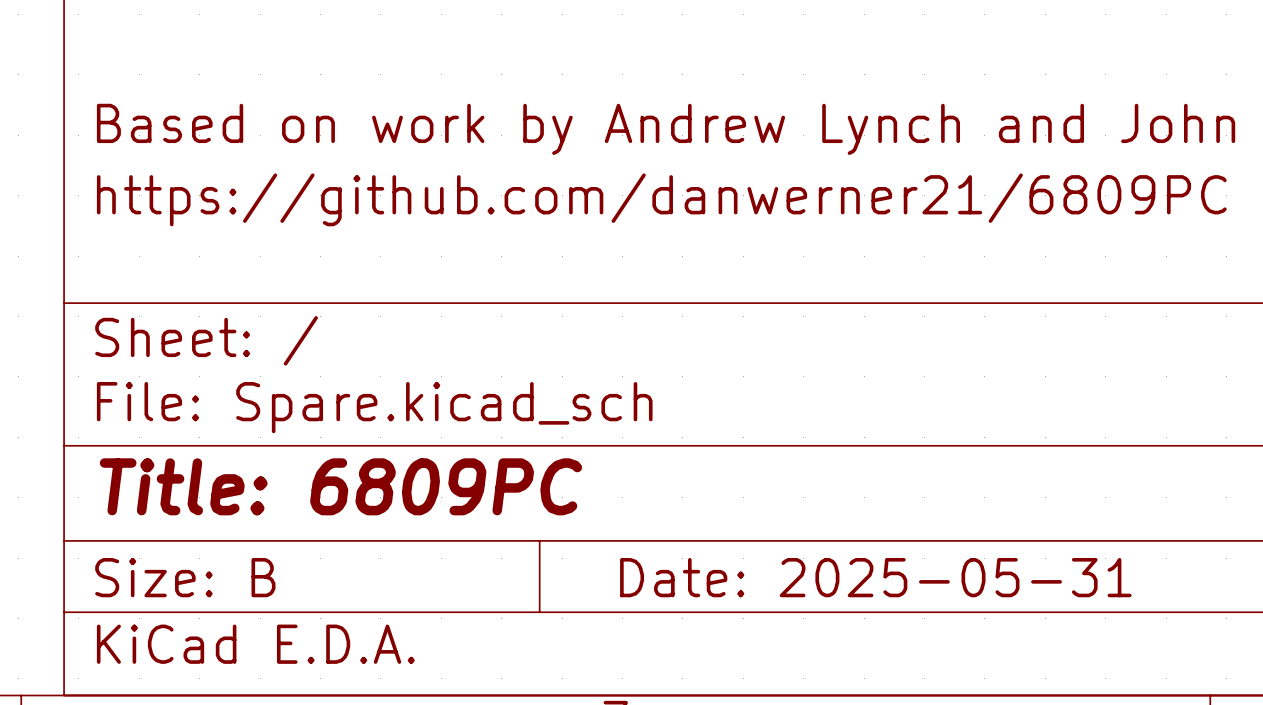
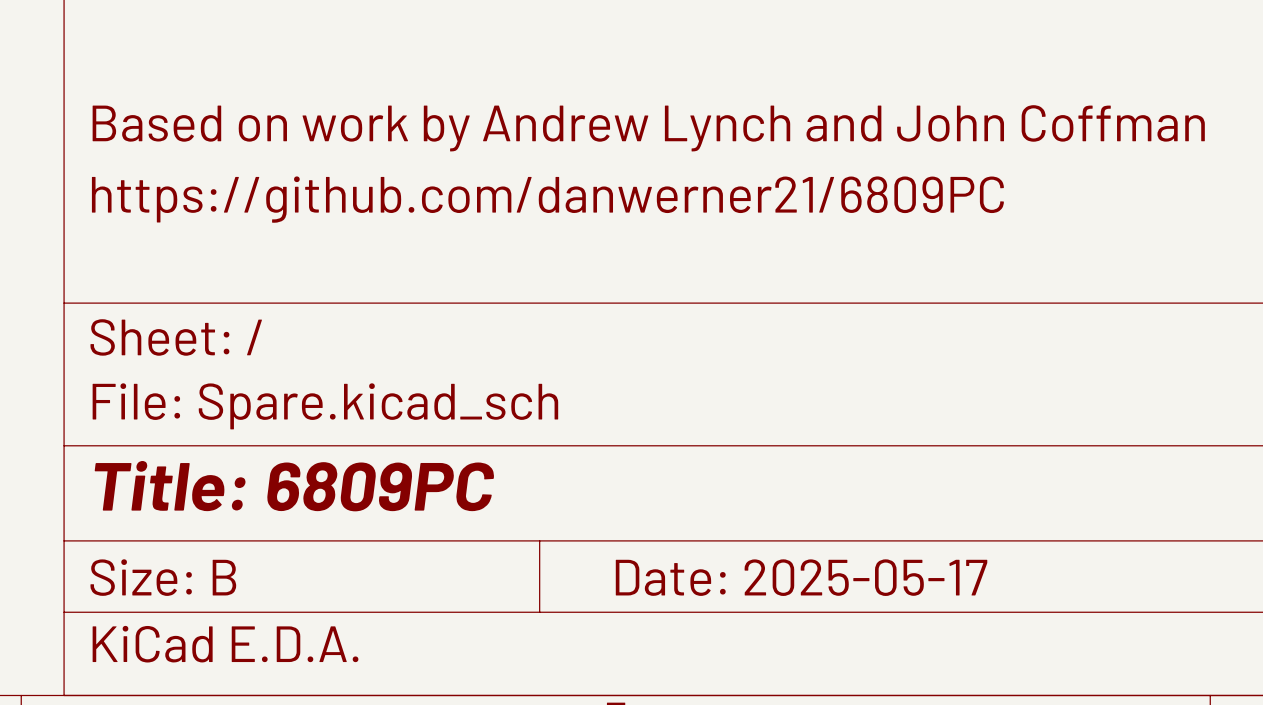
title block: Date: 2025-05-31 (875, 577) -> Date: 2025-05-17 (801, 577)

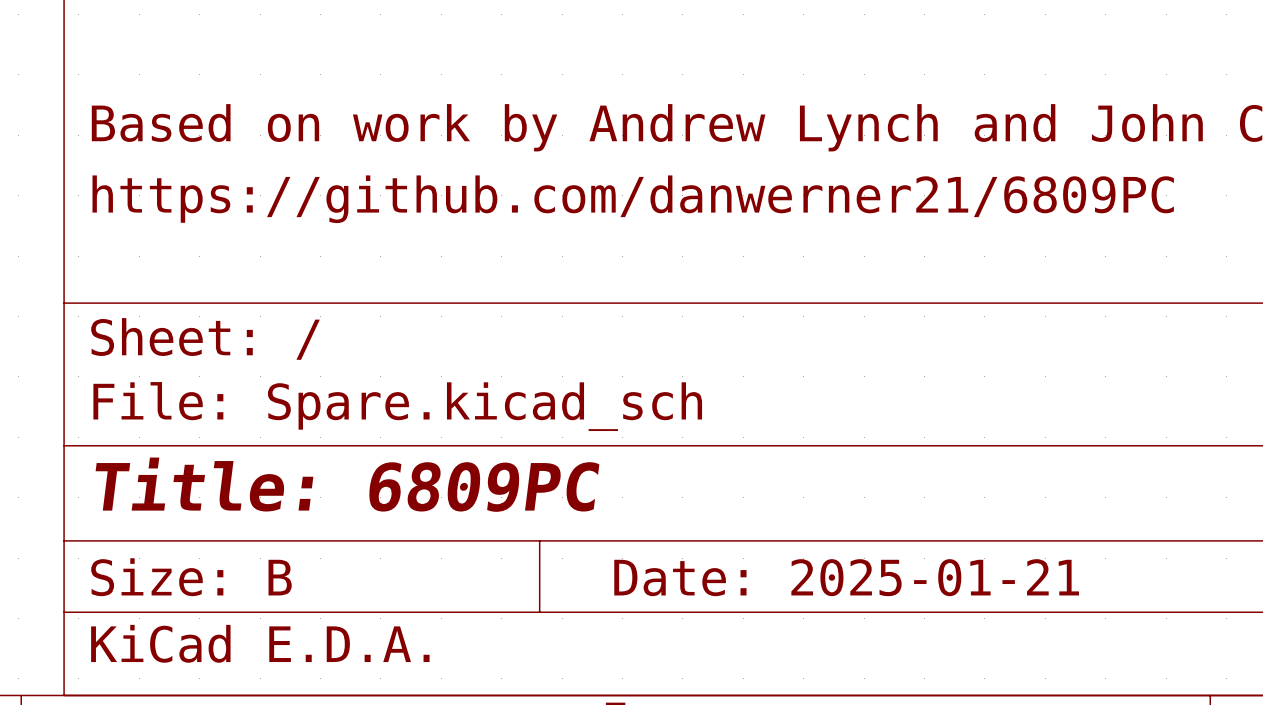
title block: Date: 2025-05-17 (801, 577) -> Date: 2025-01-21 (846, 577)

